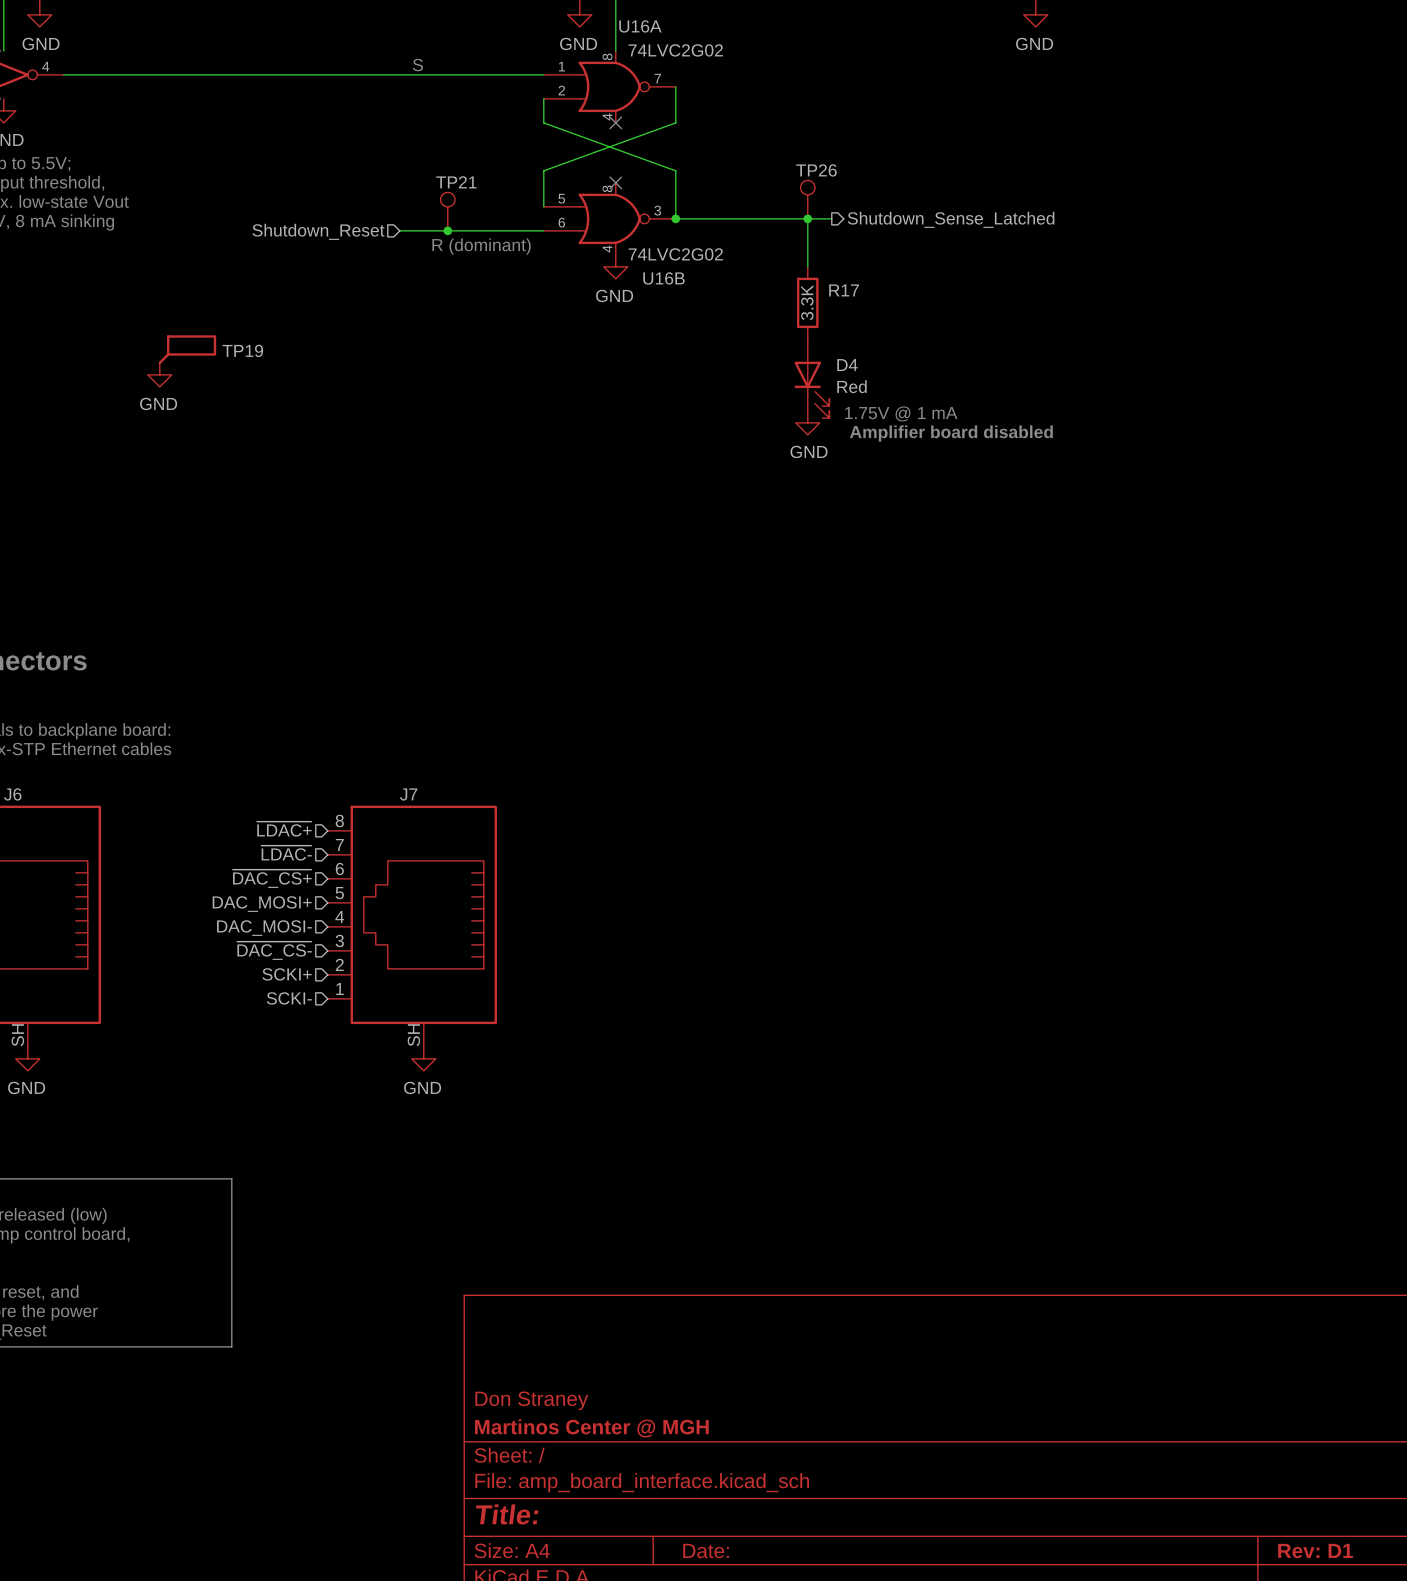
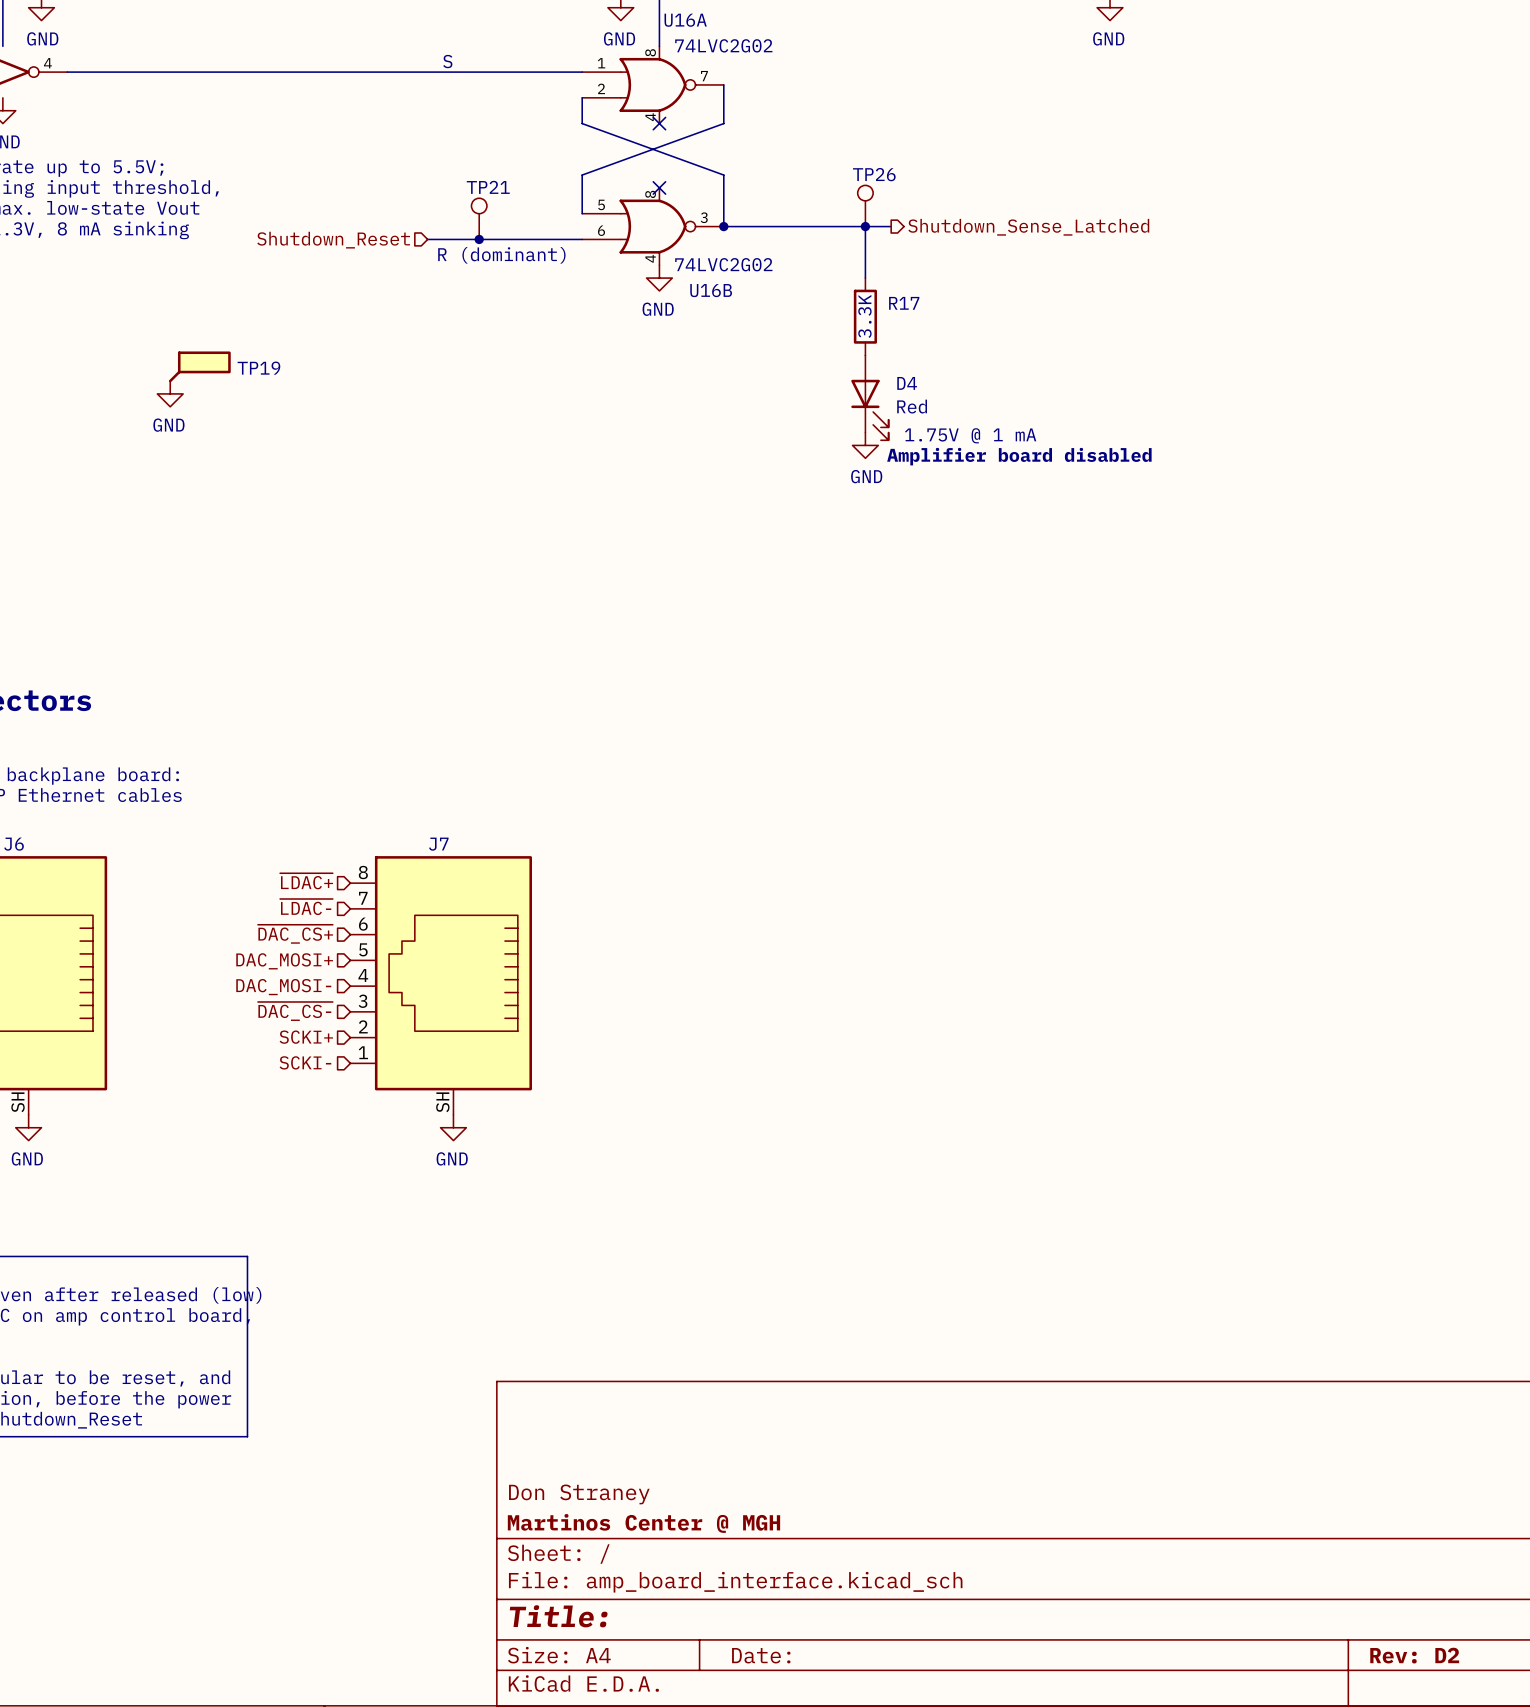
title block: Rev: D1 (1315, 1551) -> Rev: D2 (1414, 1655)

